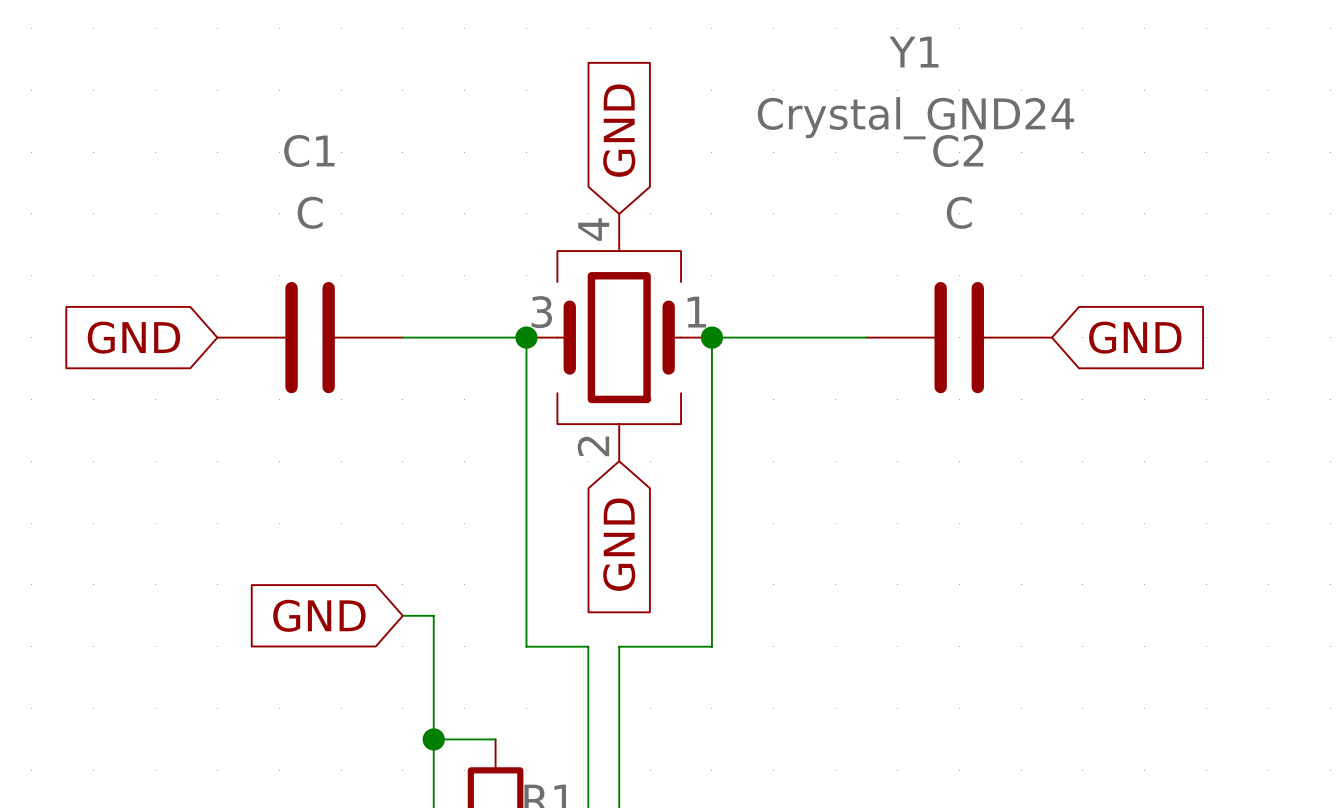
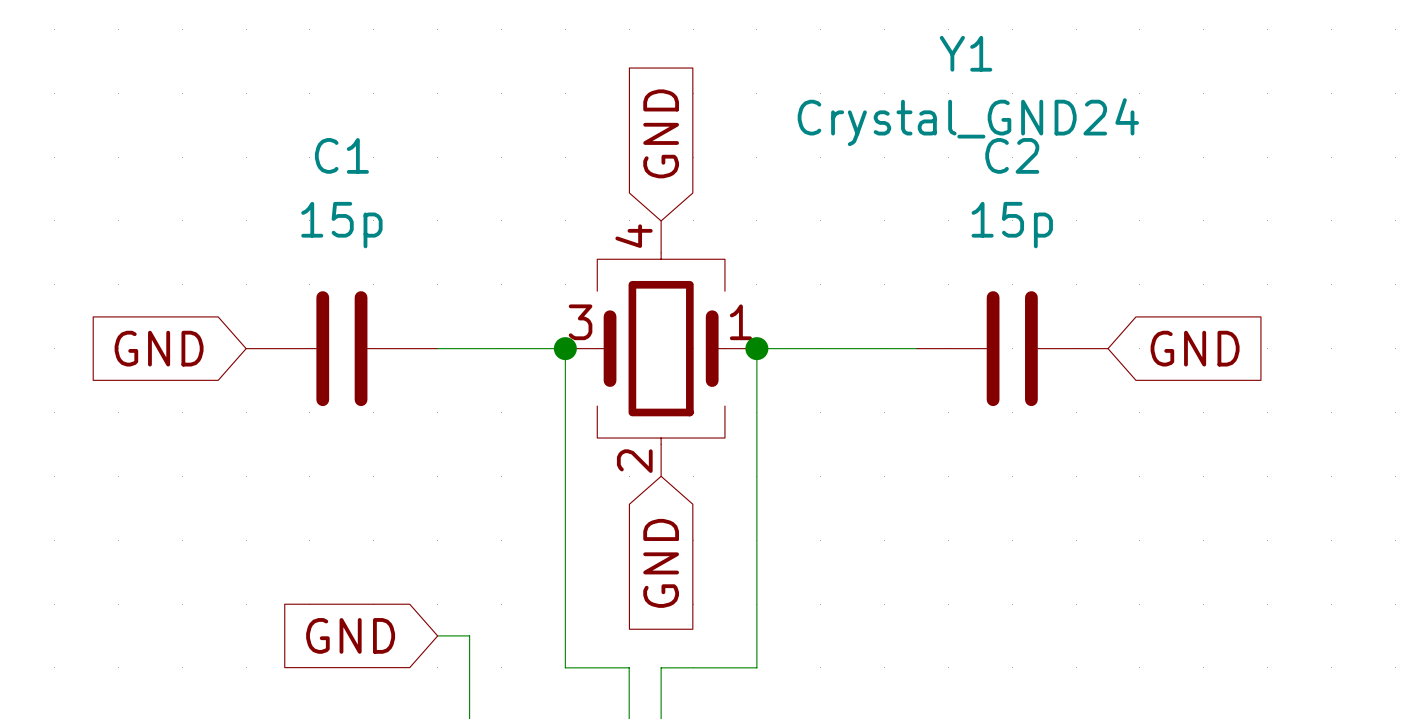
C1 value: C (310, 212) -> 15p (341, 225)
C2 value: C (959, 212) -> 15p (1012, 225)

